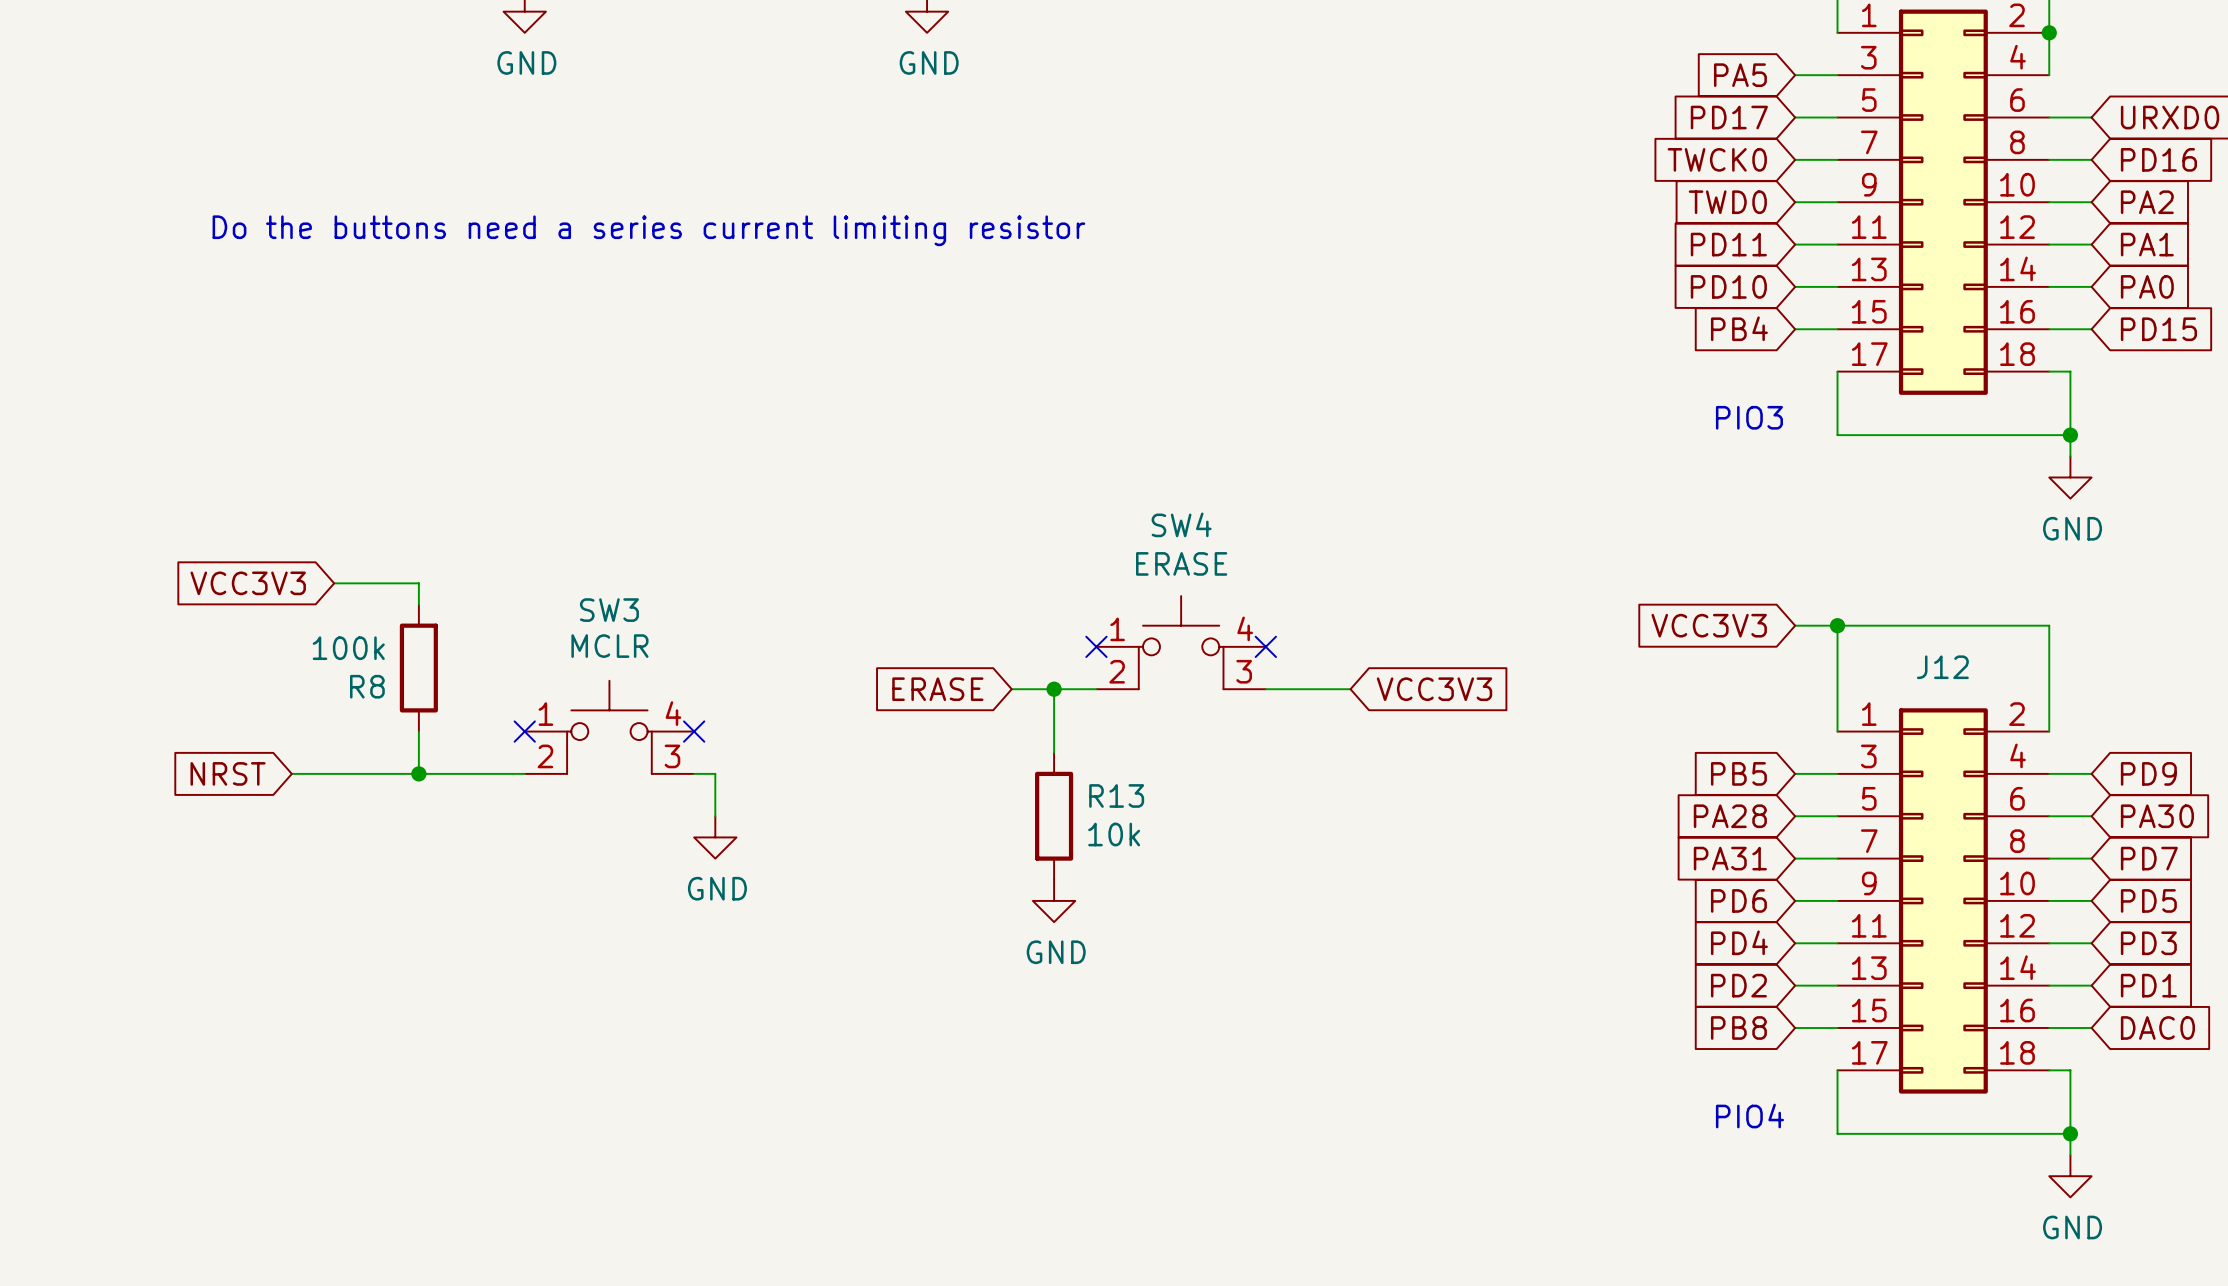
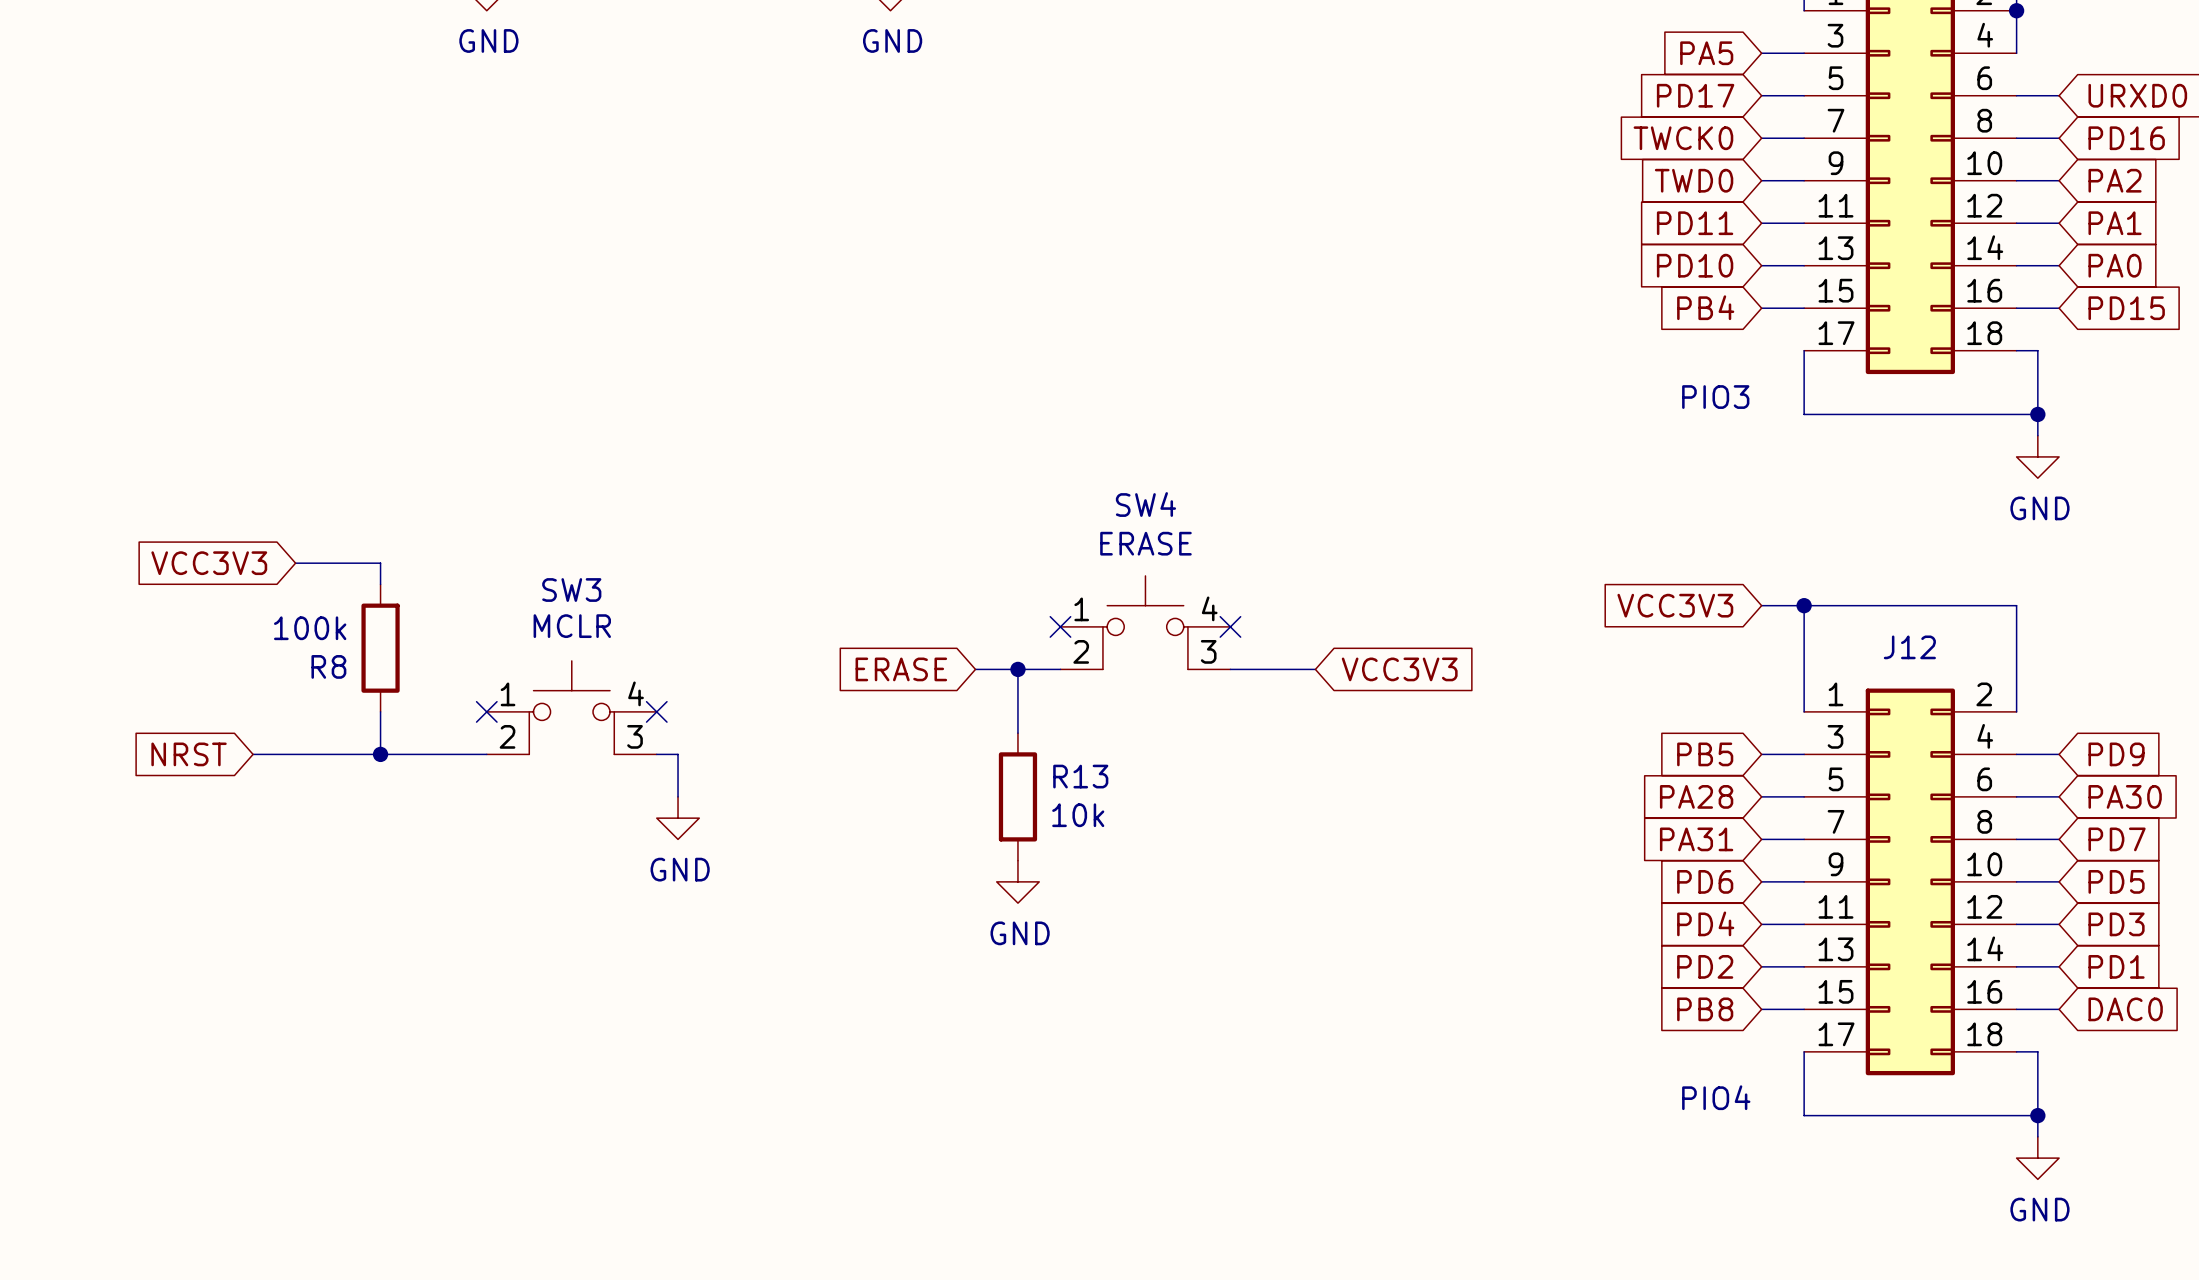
text: Do the buttons need a series current limiting resistor (648, 230) -> none

